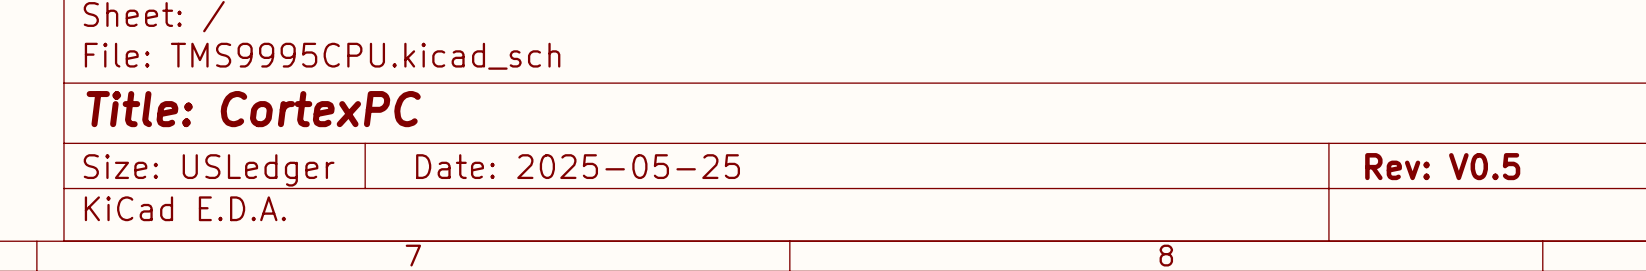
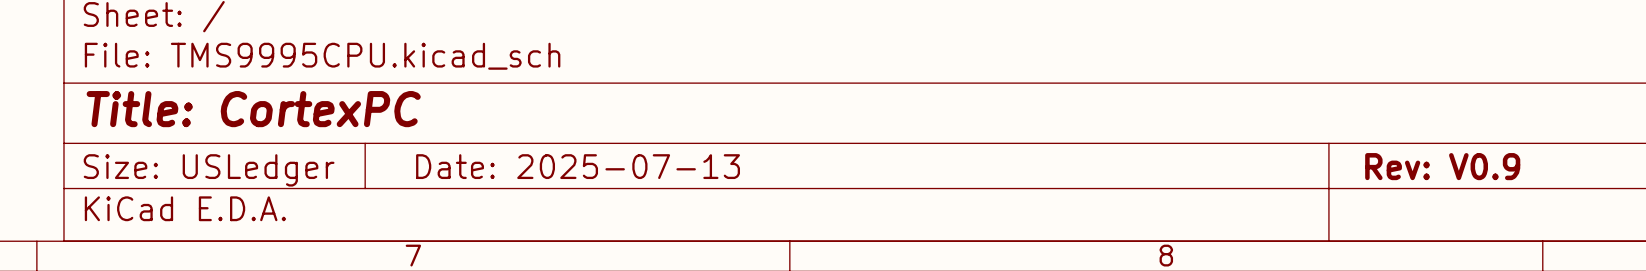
title block: Date: 2025-05-25 (578, 166) -> Date: 2025-07-13 (578, 166)
title block: Rev: V0.5 (1442, 166) -> Rev: V0.9 (1442, 166)

